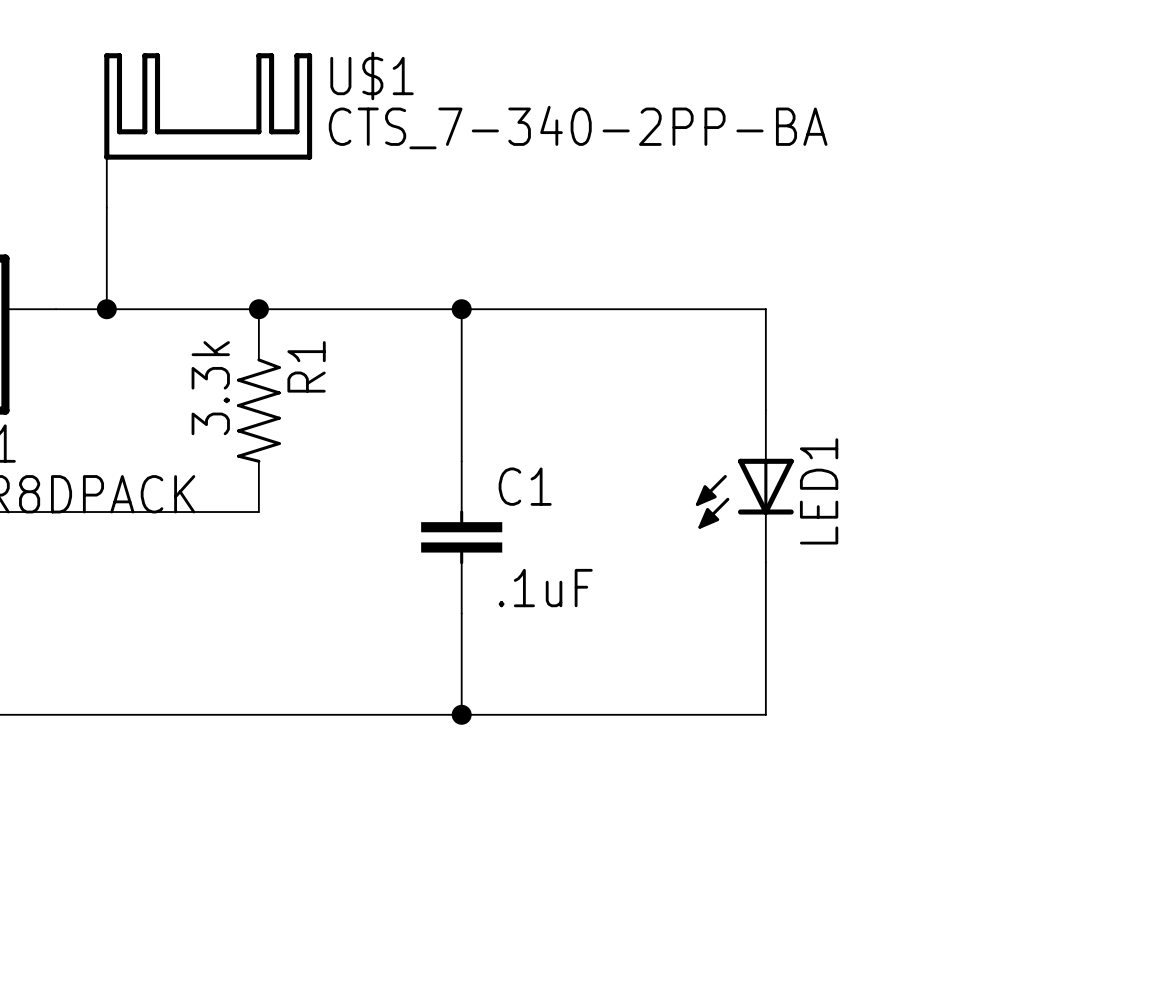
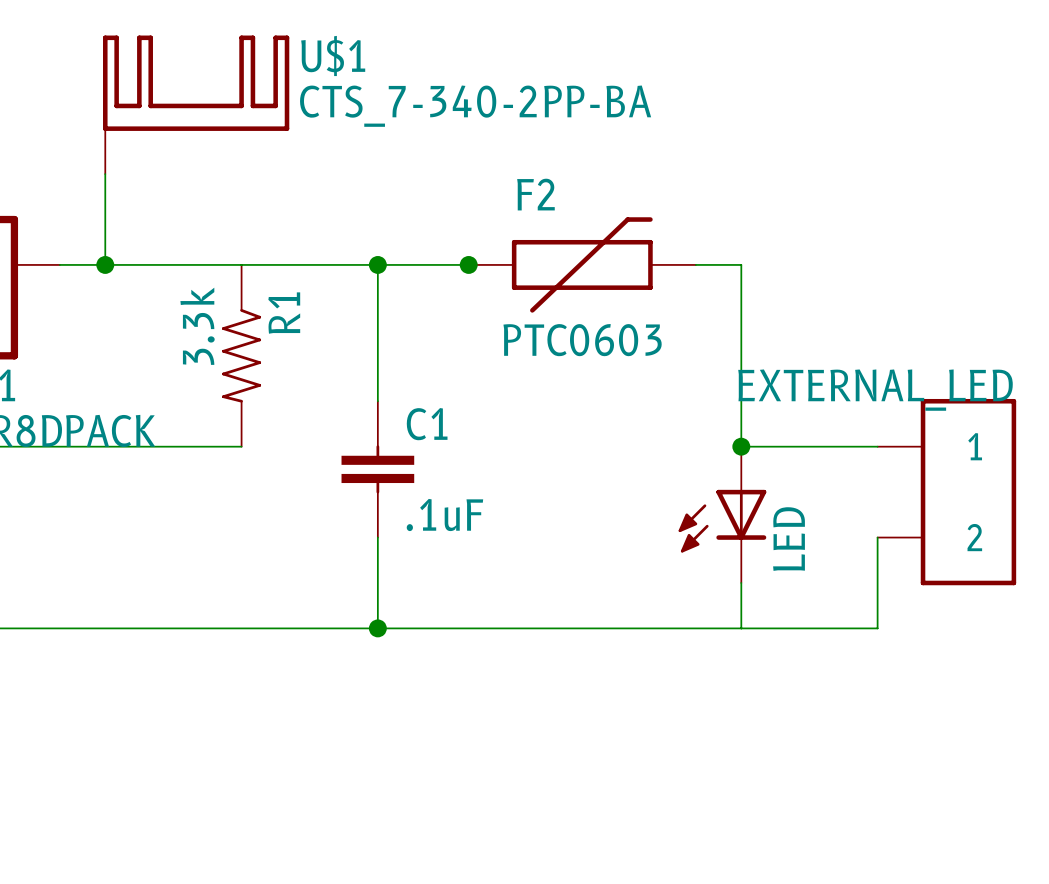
junction: (258, 309) -> none
junction: none -> (377, 264)
wire: (461, 309) (461, 461) -> (377, 264) (377, 401)
junction: (461, 309) -> none
wire: (512, 309) (765, 309) (765, 410) -> none
junction: none -> (468, 264)
F2: none -> PTC0603 (582, 264)
wire: none -> (695, 264) (741, 264) (741, 446) (877, 446)
LED1: (744, 486) -> none
junction: none -> (741, 446)
C1 position: (461, 537) -> (377, 469)
wire: (765, 562) (765, 714) -> (877, 537) (877, 628) (695, 628)
EXTERNAL_LED: none -> (946, 492)
LED: none -> (722, 514)
wire: (461, 613) (461, 714) -> (377, 537) (377, 628)
wire: none -> (741, 582) (741, 628)
junction position: (461, 714) -> (377, 628)

